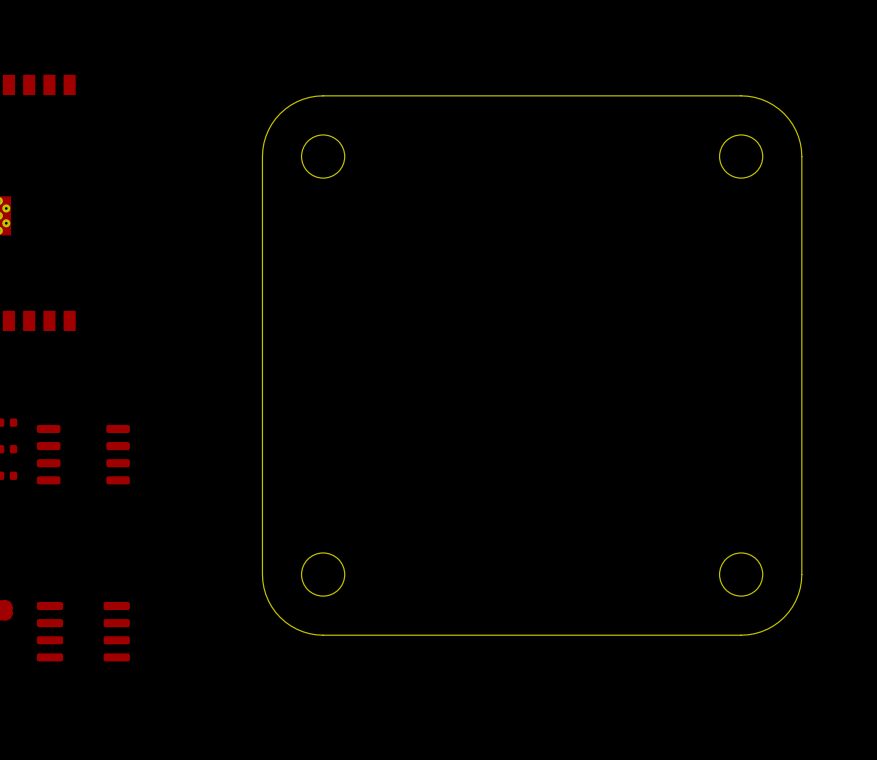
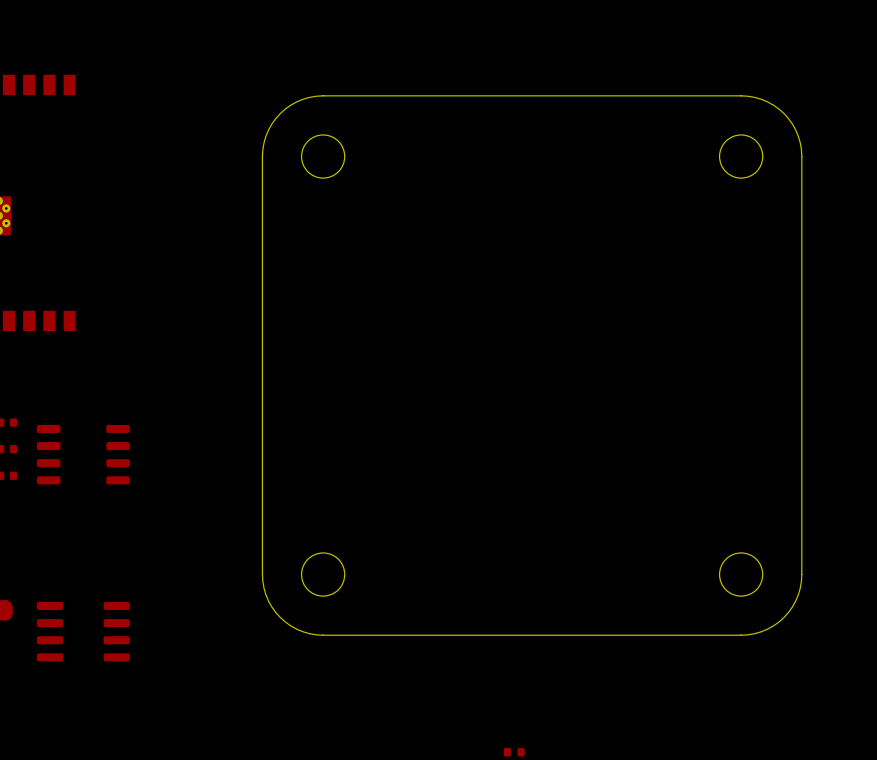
part: none -> (514, 752)

